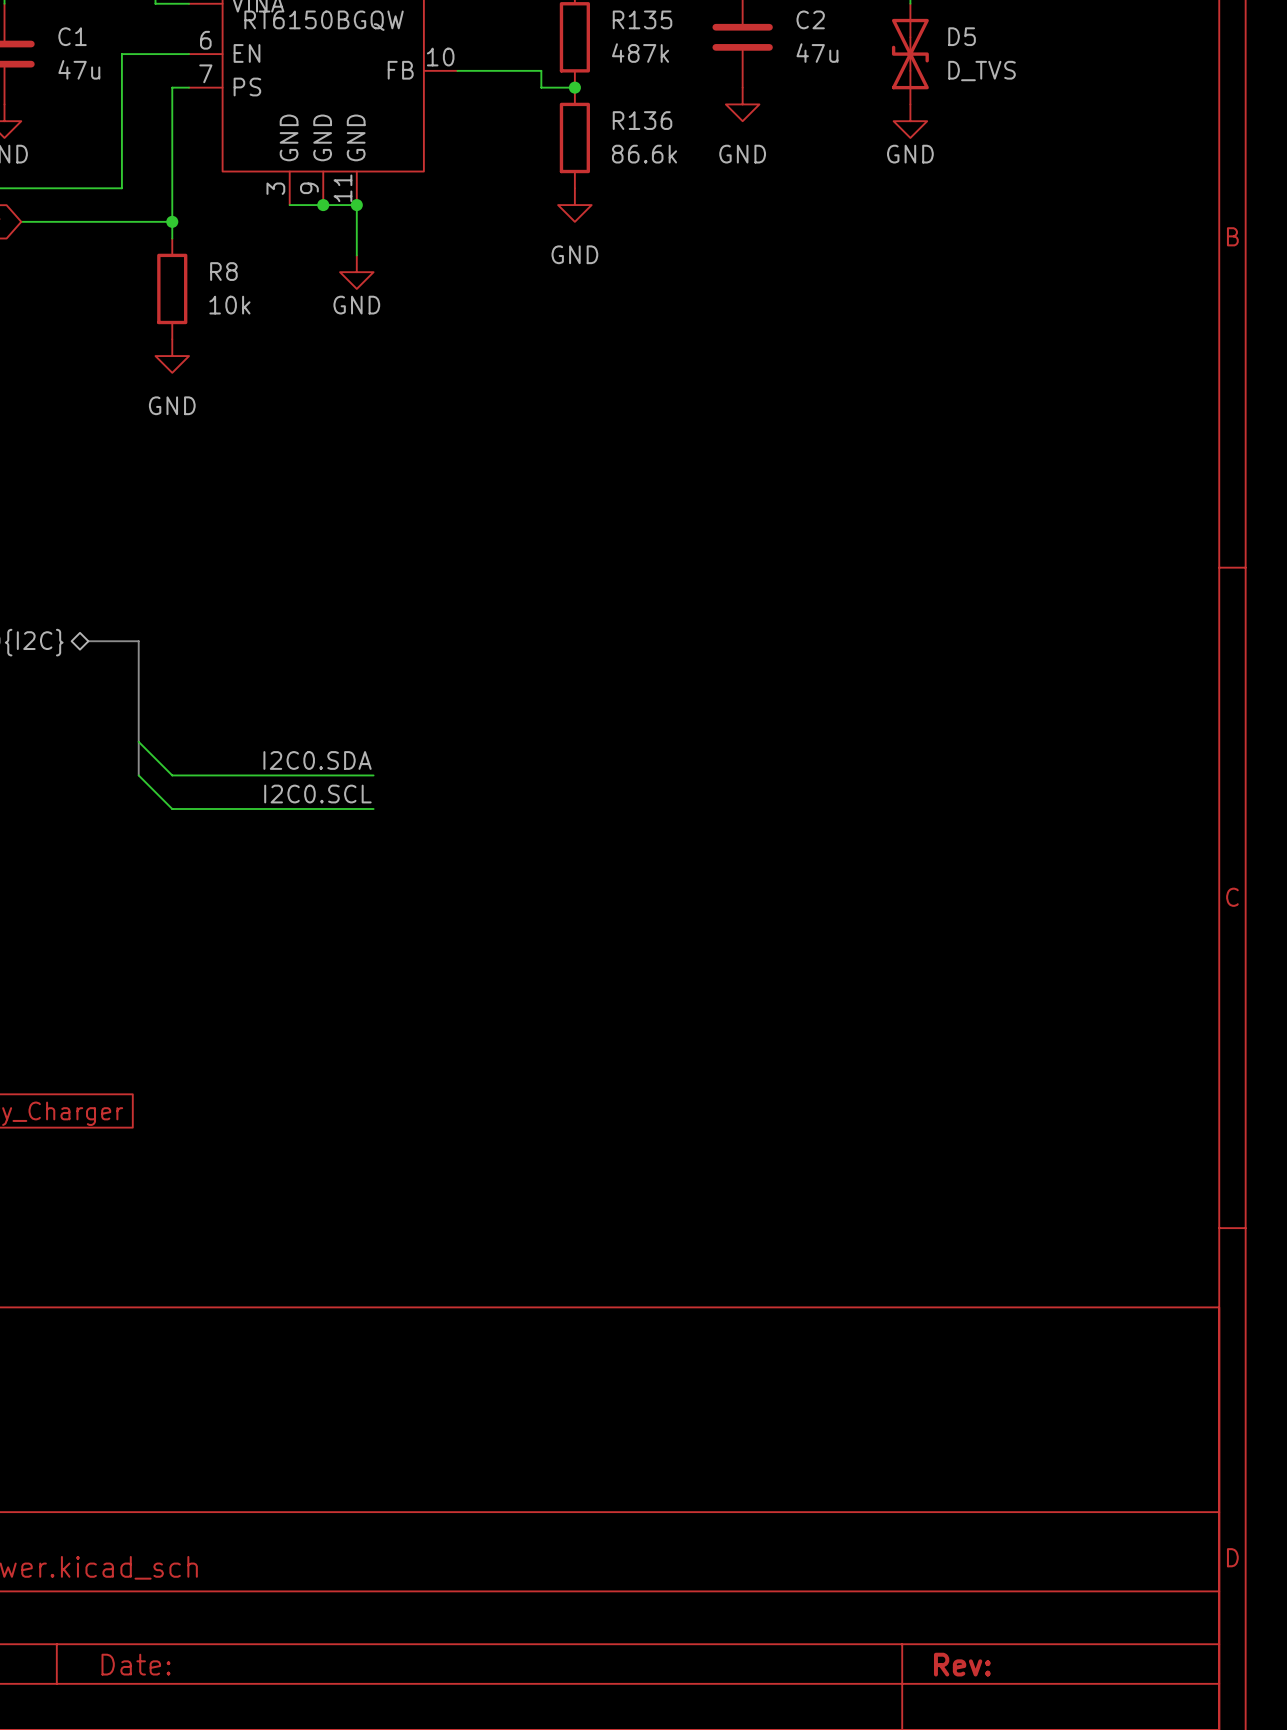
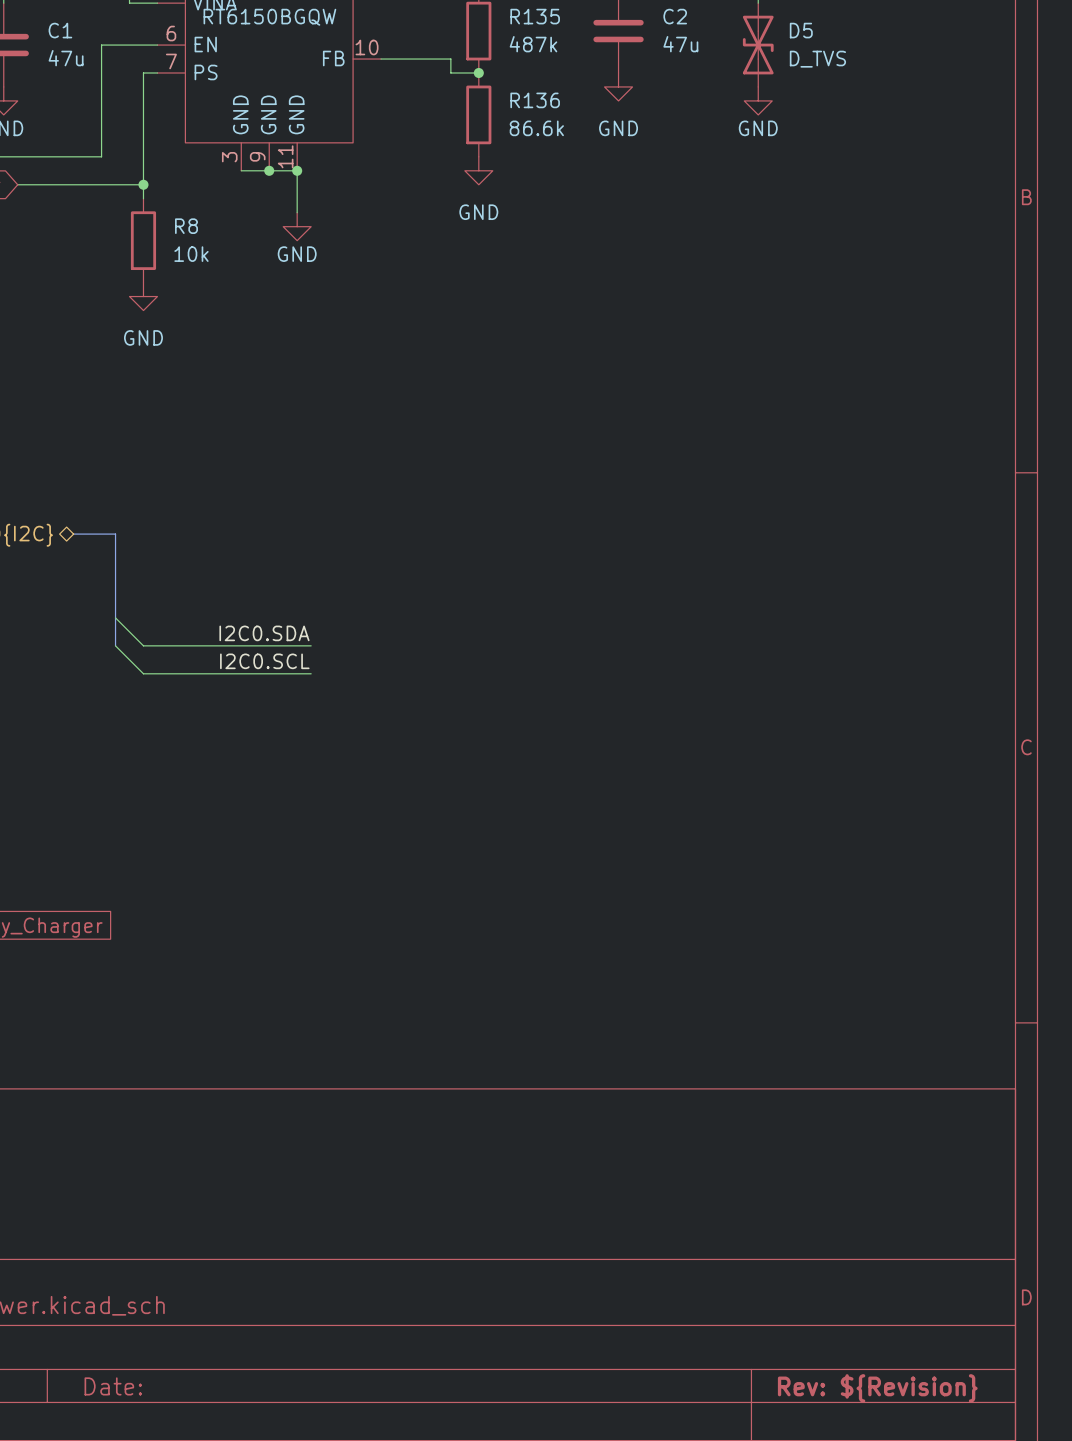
title block: Rev: (962, 1664) -> Rev: ${Revision} (877, 1388)

